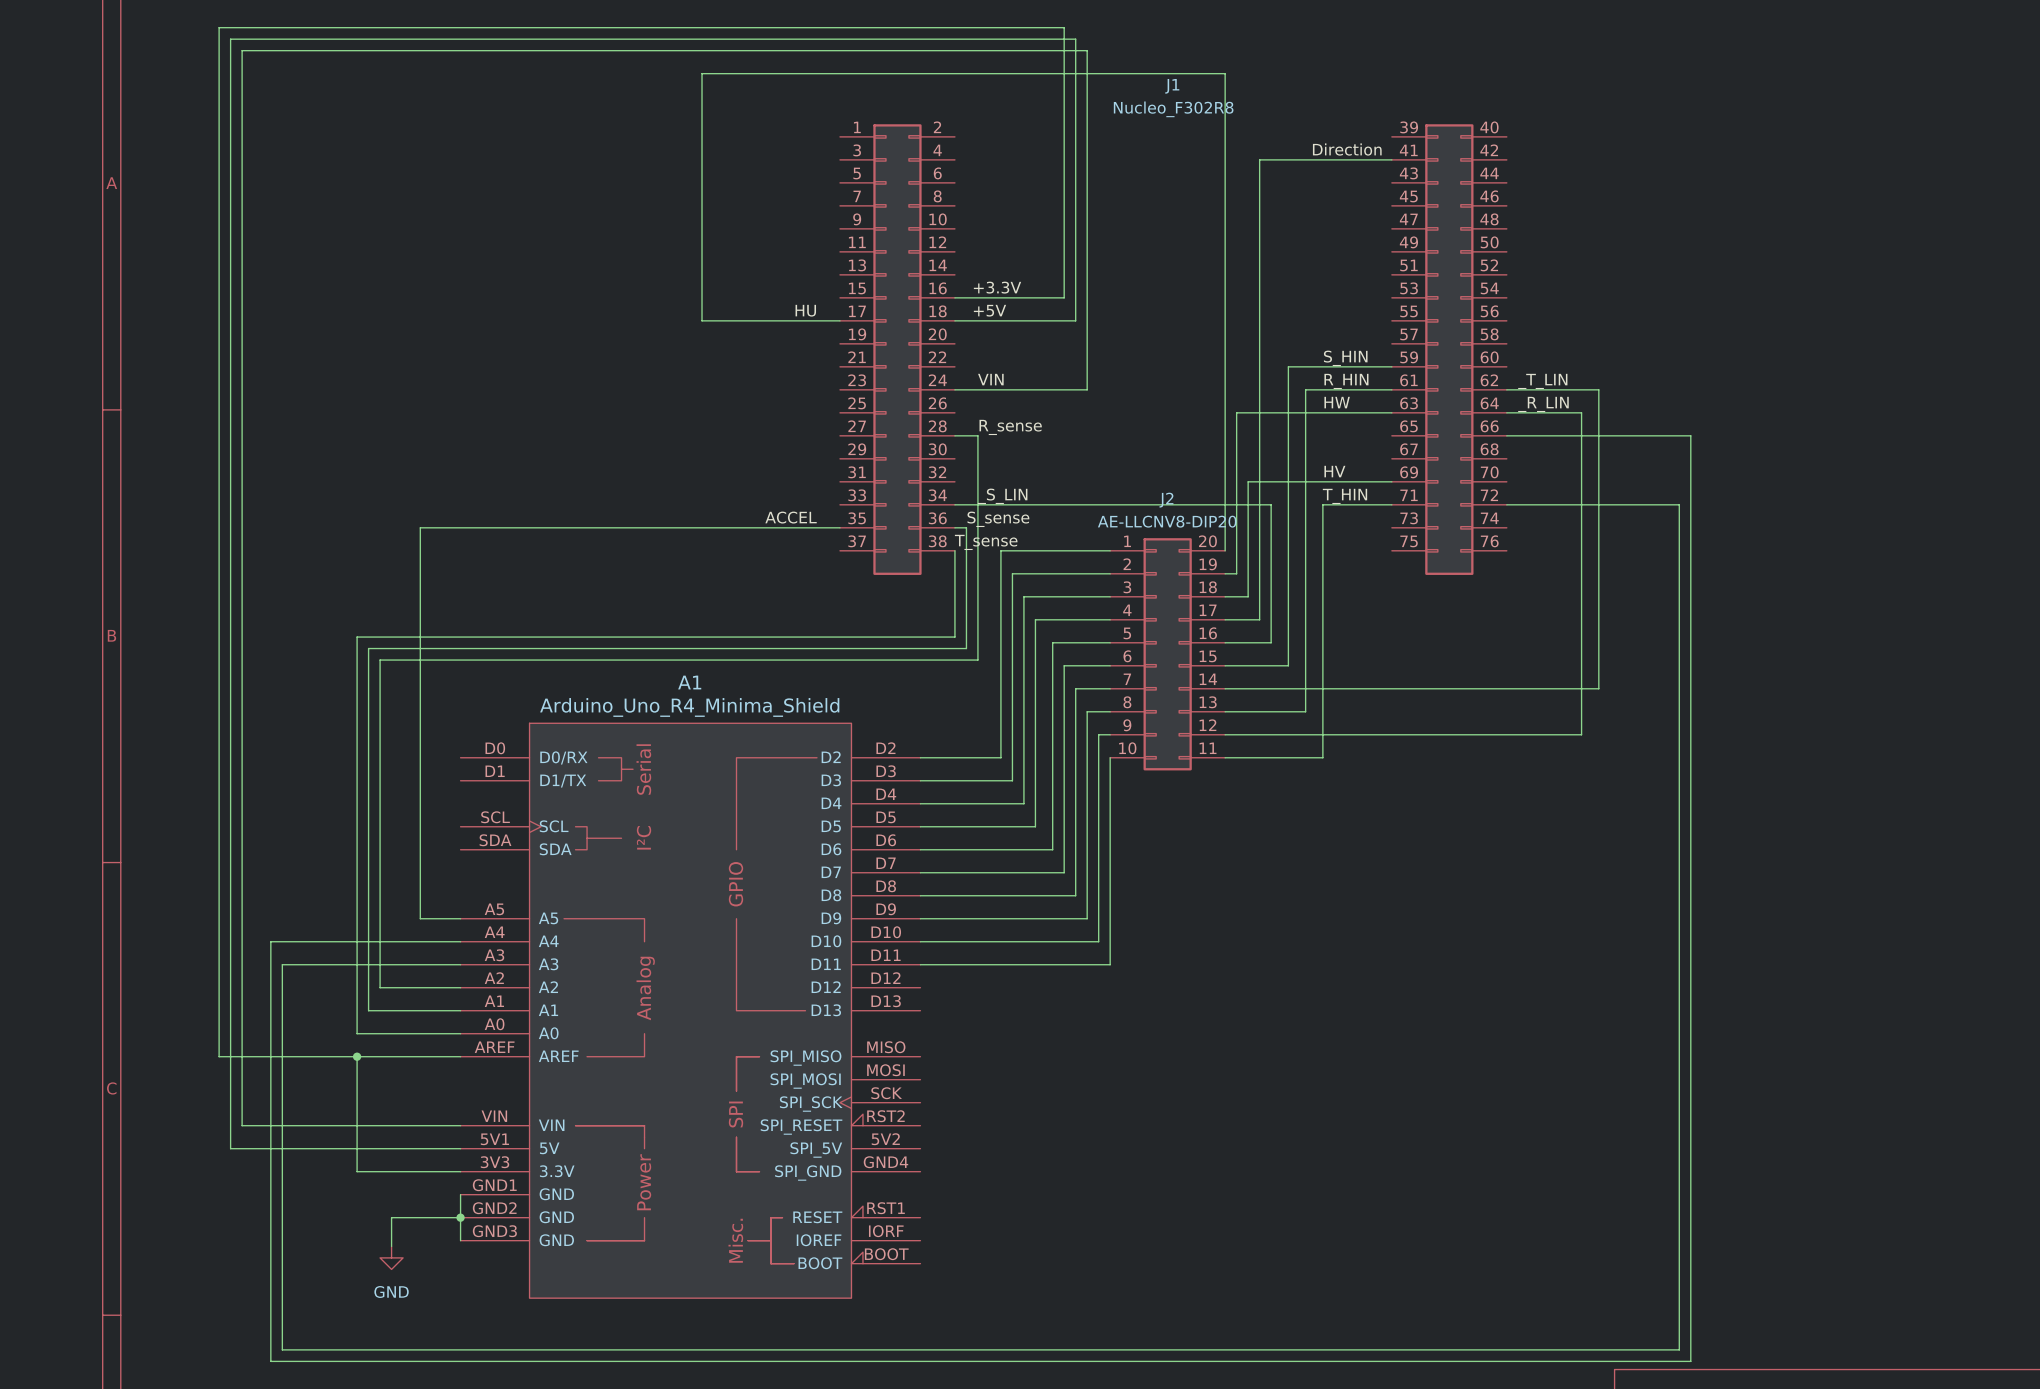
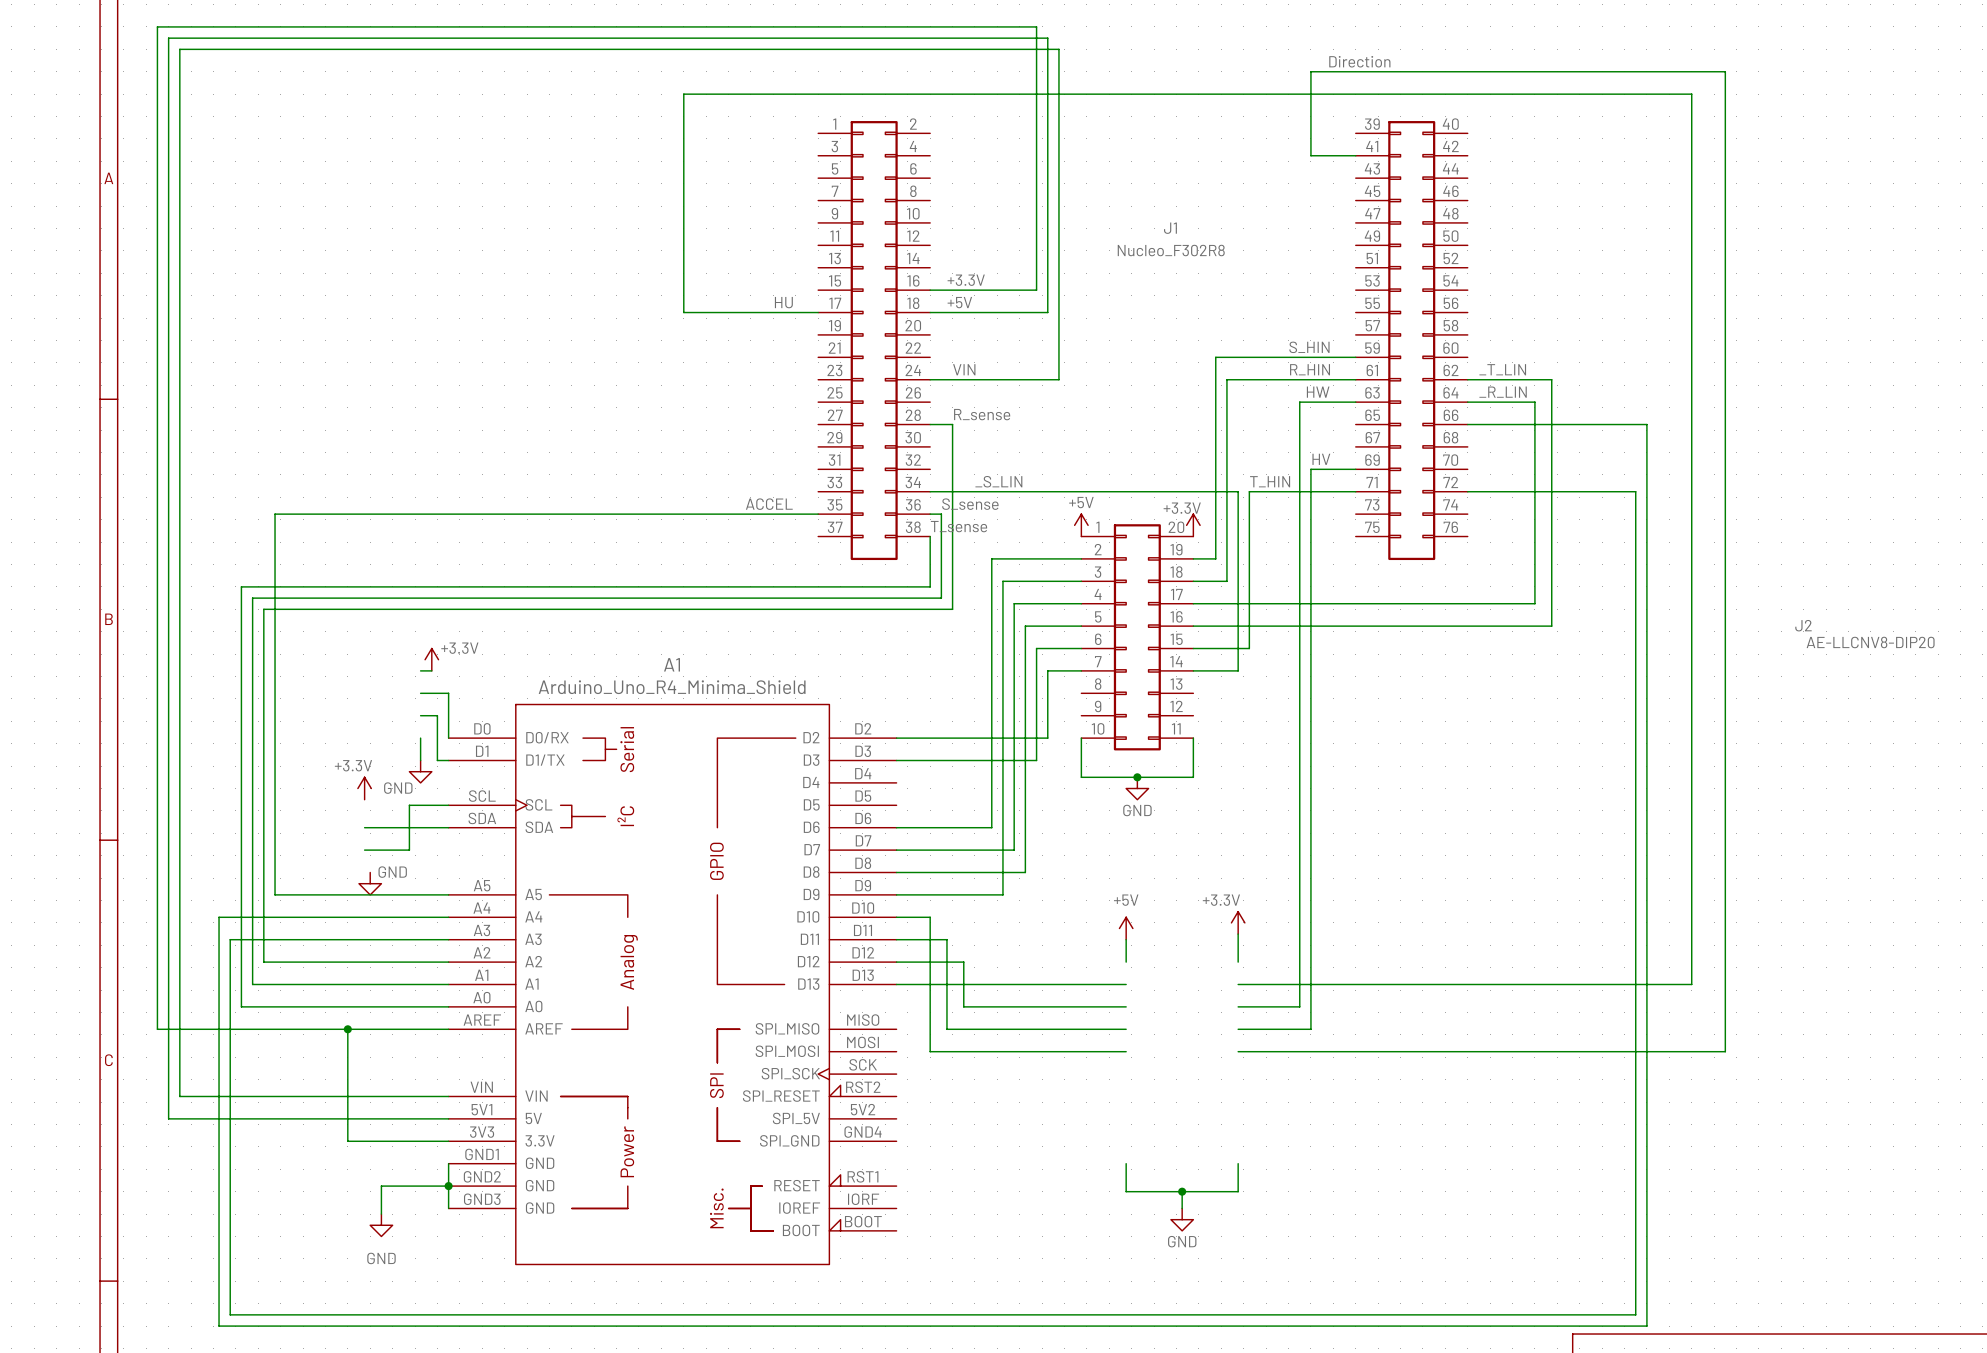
wire: (219, 27) (219, 1056) -> (213, 26) (157, 26) (157, 1029) (213, 1029)
wire: (230, 39) (230, 1148) -> (224, 38) (168, 38) (168, 1118) (224, 1118)
wire: (242, 50) (242, 1125) -> (235, 49) (179, 49) (179, 1096) (235, 1096)
J1 name position: J1 (1172, 86) -> J1 (1170, 228)
wire: (702, 96) (702, 73) (1225, 73) (1225, 550) -> (683, 94) (1691, 94) (1691, 984) (1238, 984)
J1 value position: Nucleo_F302R8 (1173, 109) -> Nucleo_F302R8 (1171, 250)
label position: Direction (1347, 149) -> Direction (1359, 61)
wire: (1345, 159) (1259, 159) (1259, 389) -> (1271, 379) (1226, 379)
wire: none -> (1310, 155) (1310, 71) (1725, 71) (1725, 1051) (1238, 1051)
wire: (1288, 366) (1288, 665) (1282, 665) -> none
wire: (1305, 389) (1305, 711) (1225, 711) -> none
wire: (1593, 389) (1598, 389) (1598, 688) (1271, 688) -> (1551, 379) (1551, 626) (1238, 626) (1238, 670)
label position: HW (1337, 402) -> HW (1318, 392)
wire: (1334, 412) (1236, 412) (1236, 573) -> (1215, 558) (1204, 558)
wire: none -> (1299, 402) (1299, 1006) (1238, 1006)
wire: (1575, 412) (1581, 412) (1581, 734) (1225, 734) -> (1534, 402) (1534, 603) (1226, 603)
label position: HV (1334, 471) -> HV (1321, 459)
wire: (1248, 481) (1345, 481) -> (1215, 469) (1215, 357) (1254, 357)
wire: none -> (1310, 469) (1310, 1029) (1238, 1029)
label position: _S_LIN (1002, 496) -> _S_LIN (998, 481)
label position: T_HIN (1344, 496) -> T_HIN (1270, 481)
J2 name position: J2 (1166, 500) -> J2 (1803, 625)
wire: (1322, 504) (1322, 757) (1225, 757) -> (1288, 491) (1249, 491) (1249, 648)
J2 value position: AE-LLCNV8-DIP20 (1167, 521) -> AE-LLCNV8-DIP20 (1870, 642)
wire: (420, 527) (420, 826) -> (409, 514) (275, 514) (275, 894) (409, 894)
power symbol: none -> +5V (1081, 525)
power symbol: none -> +3.3V (1193, 525)
wire: (1110, 550) (1000, 550) (1000, 757) -> none
wire: (1018, 573) (1012, 573) (1012, 780) -> (991, 558) (991, 827)
wire: (1248, 573) (1248, 596) -> (1226, 581) (1215, 581)
wire: (1029, 596) (1023, 596) (1023, 803) (920, 803) -> none
wire: (1259, 596) (1259, 619) -> none
wire: (954, 602) (954, 637) (357, 637) (357, 1033) -> (930, 586) (241, 586) (241, 1006) (347, 1006)
wire: (966, 614) (966, 648) (368, 648) (368, 1010) -> (941, 598) (252, 598) (252, 984) (359, 984)
wire: (1041, 619) (1035, 619) (1035, 826) (920, 826) -> (1014, 603) (1014, 850)
wire: (977, 625) (977, 660) (380, 660) (380, 987) -> (952, 609) (263, 609) (263, 917) (219, 917) (219, 1326) (263, 1326)
power symbol: none -> +3.3V (431, 659)
wire: none -> (420, 670) (431, 670)
wire: none -> (420, 693) (448, 693) (448, 738)
wire: (1110, 711) (1087, 711) (1087, 918) (1029, 918) -> (1002, 581) (1002, 894)
wire: none -> (420, 715) (437, 715) (437, 760) (448, 760)
wire: (1110, 734) (1098, 734) (1098, 941) (954, 941) -> (1126, 1051) (930, 1051) (930, 917)
wire: none -> (420, 738) (420, 760)
wire: (1075, 757) (1075, 895) (1052, 895) -> (1047, 738) (974, 738)
wire: none -> (1193, 738) (1193, 777) (1081, 777)
wire: (1064, 780) (1064, 872) (1041, 872) -> (1036, 760) (986, 760)
power symbol: none -> GND (420, 771)
wire: (1110, 798) (1110, 964) (972, 964) -> (1126, 1029) (946, 1029) (946, 939)
junction: none -> (1137, 777)
power symbol: none -> +3.3V (364, 788)
power symbol: none -> GND (1137, 788)
wire: none -> (409, 805) (448, 805)
wire: none -> (364, 827) (448, 827)
wire: (1018, 849) (1052, 849) -> (1025, 872) (1025, 827)
wire: (420, 872) (420, 918) -> (409, 850) (364, 850)
power symbol: none -> GND (370, 883)
power symbol: none -> +3.3V (1238, 922)
power symbol: none -> +5V (1126, 928)
wire: none -> (1238, 934) (1238, 962)
wire: (282, 964) (282, 1349) -> (275, 939) (230, 939) (230, 1314) (275, 1314)
wire: none -> (1126, 939) (1126, 962)
wire: (270, 987) (270, 1361) -> (263, 962) (370, 962)
wire: none -> (896, 962) (963, 962) (963, 1006) (1126, 1006)
wire: none -> (896, 984) (1126, 984)
wire: none -> (1126, 1163) (1126, 1191) (1238, 1191) (1238, 1163)
wire: none -> (1182, 1191) (1182, 1208)
junction: none -> (1182, 1191)
power symbol: none -> GND (1182, 1219)

